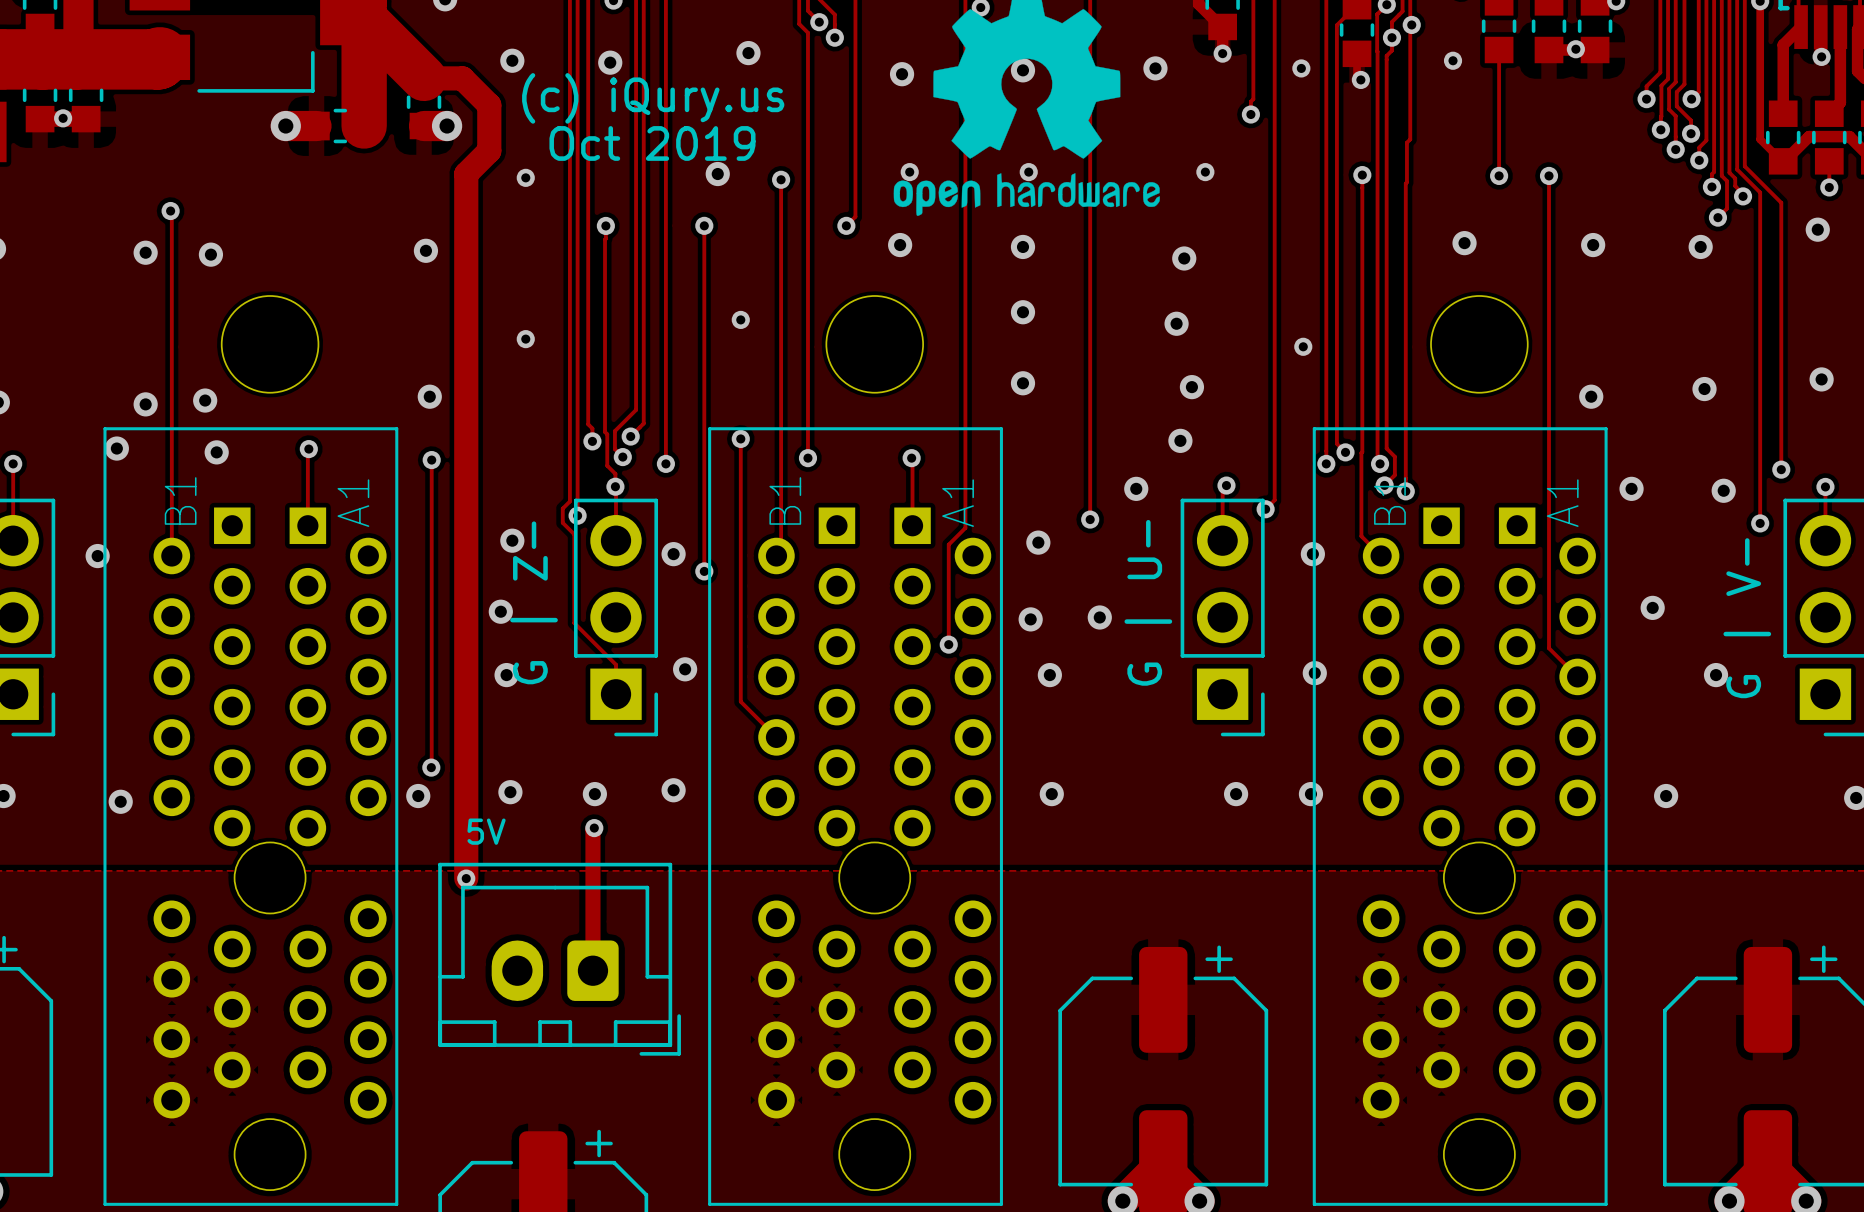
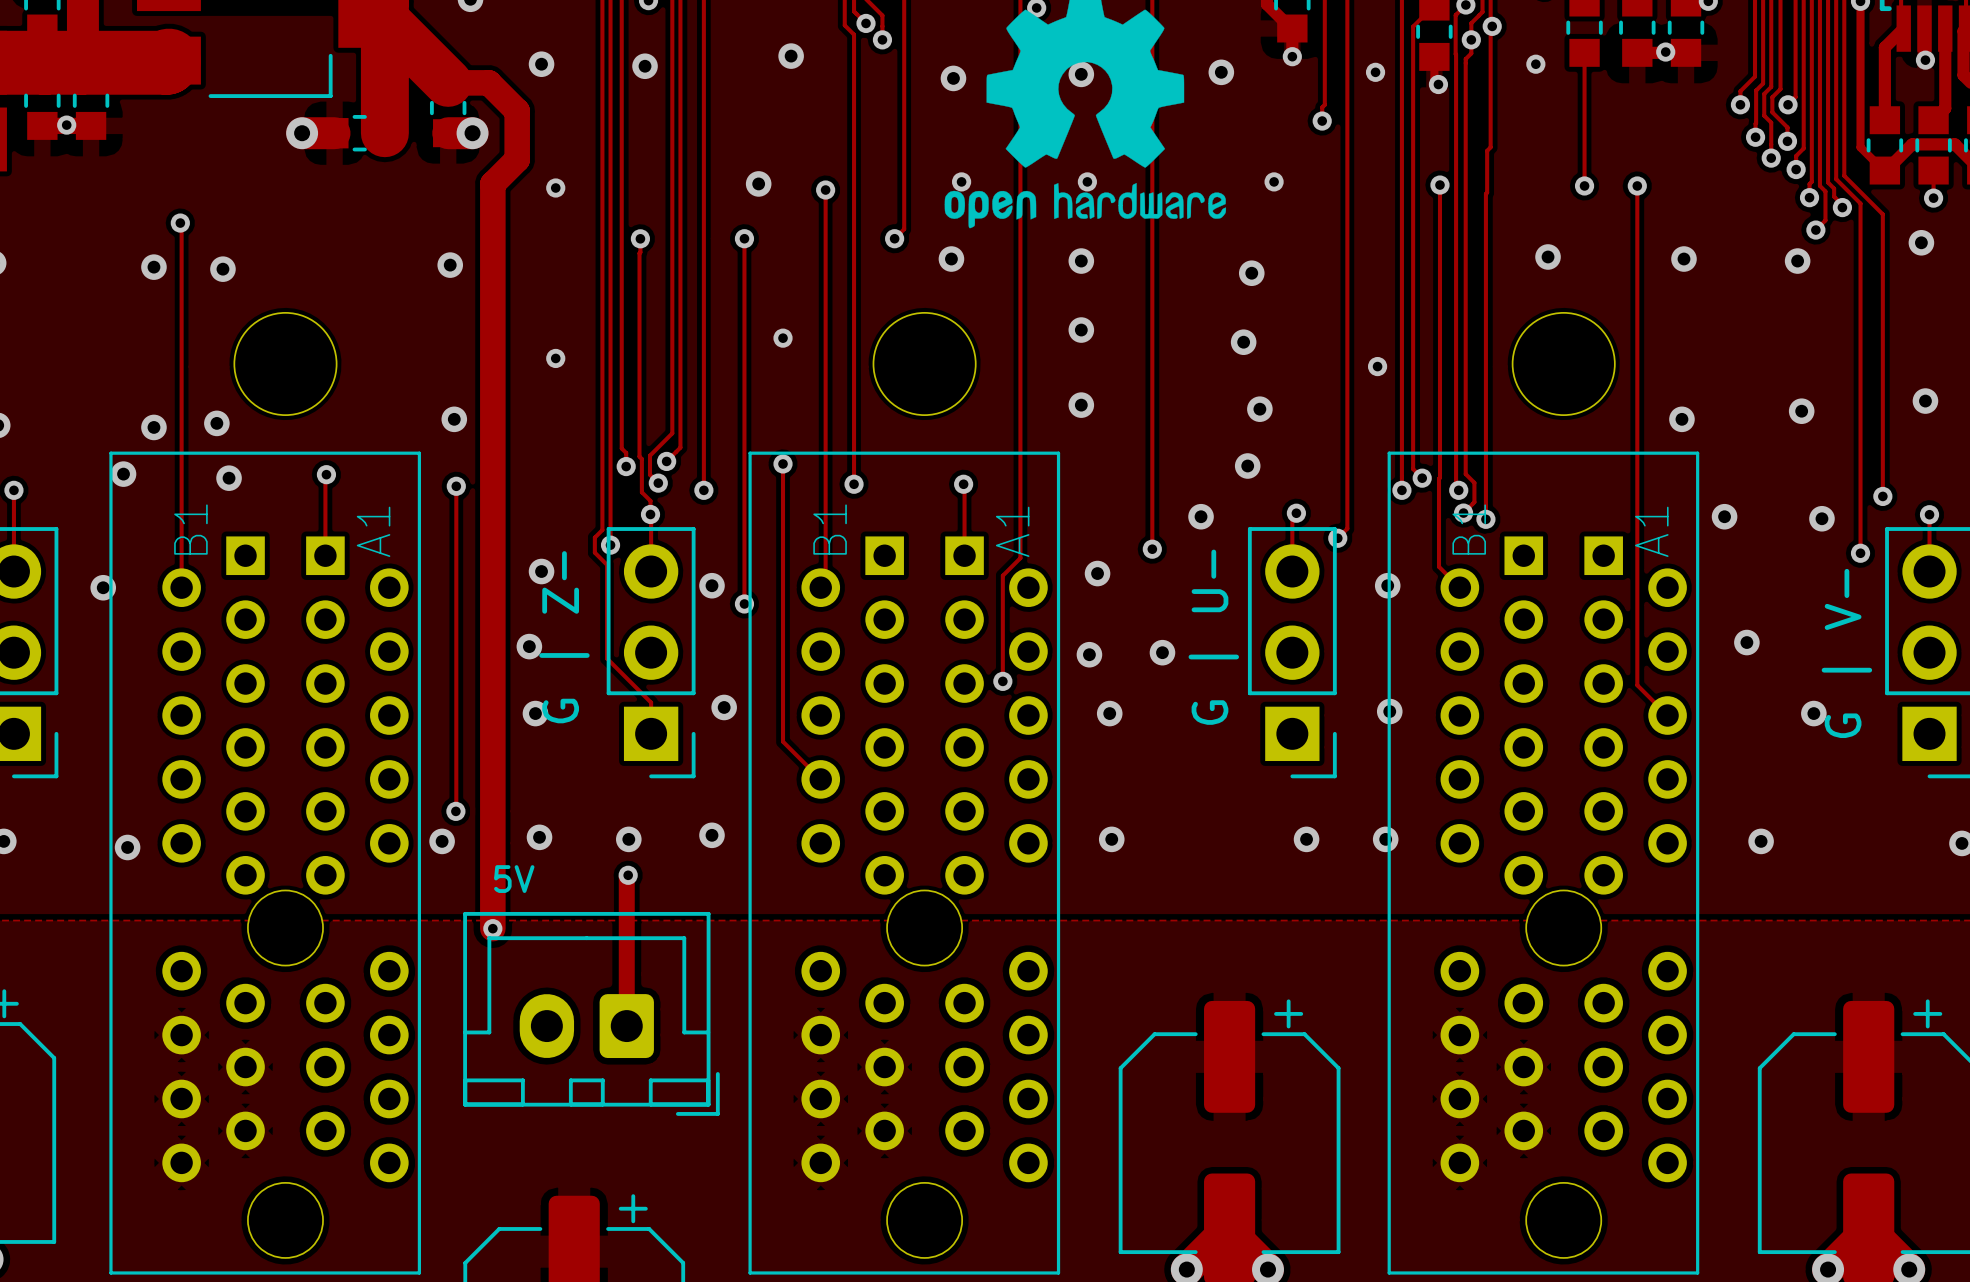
text: (c) iQury.us (653, 98) -> none
text: Oct 2019 (652, 143) -> none

